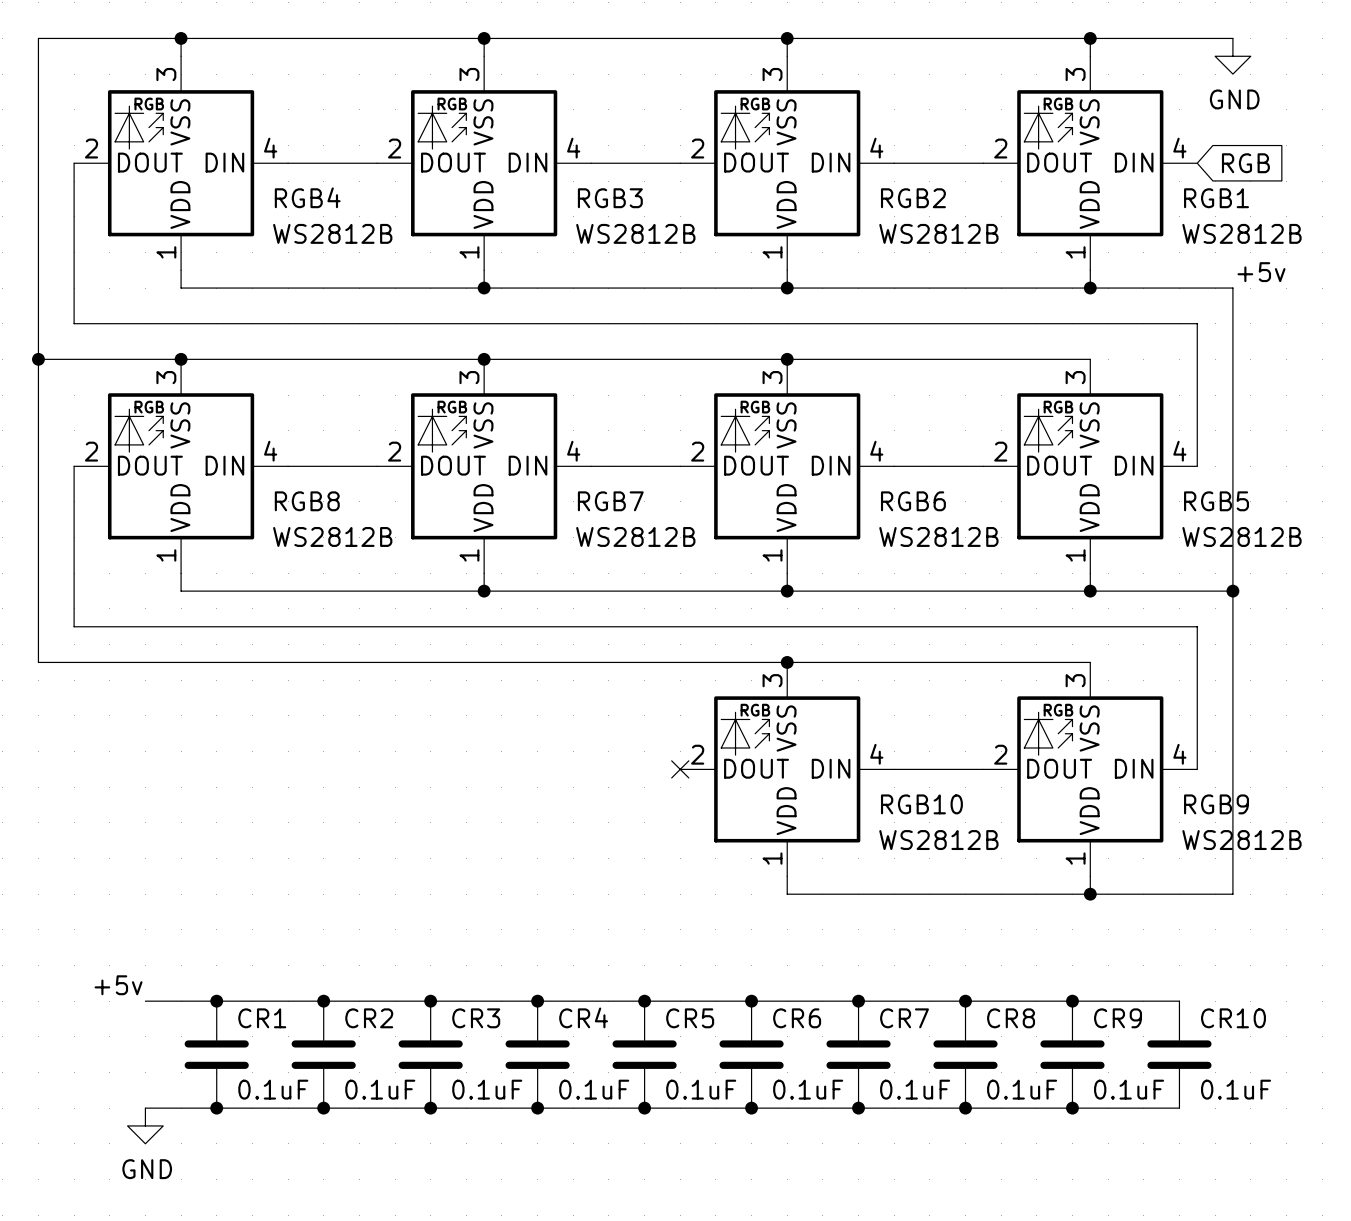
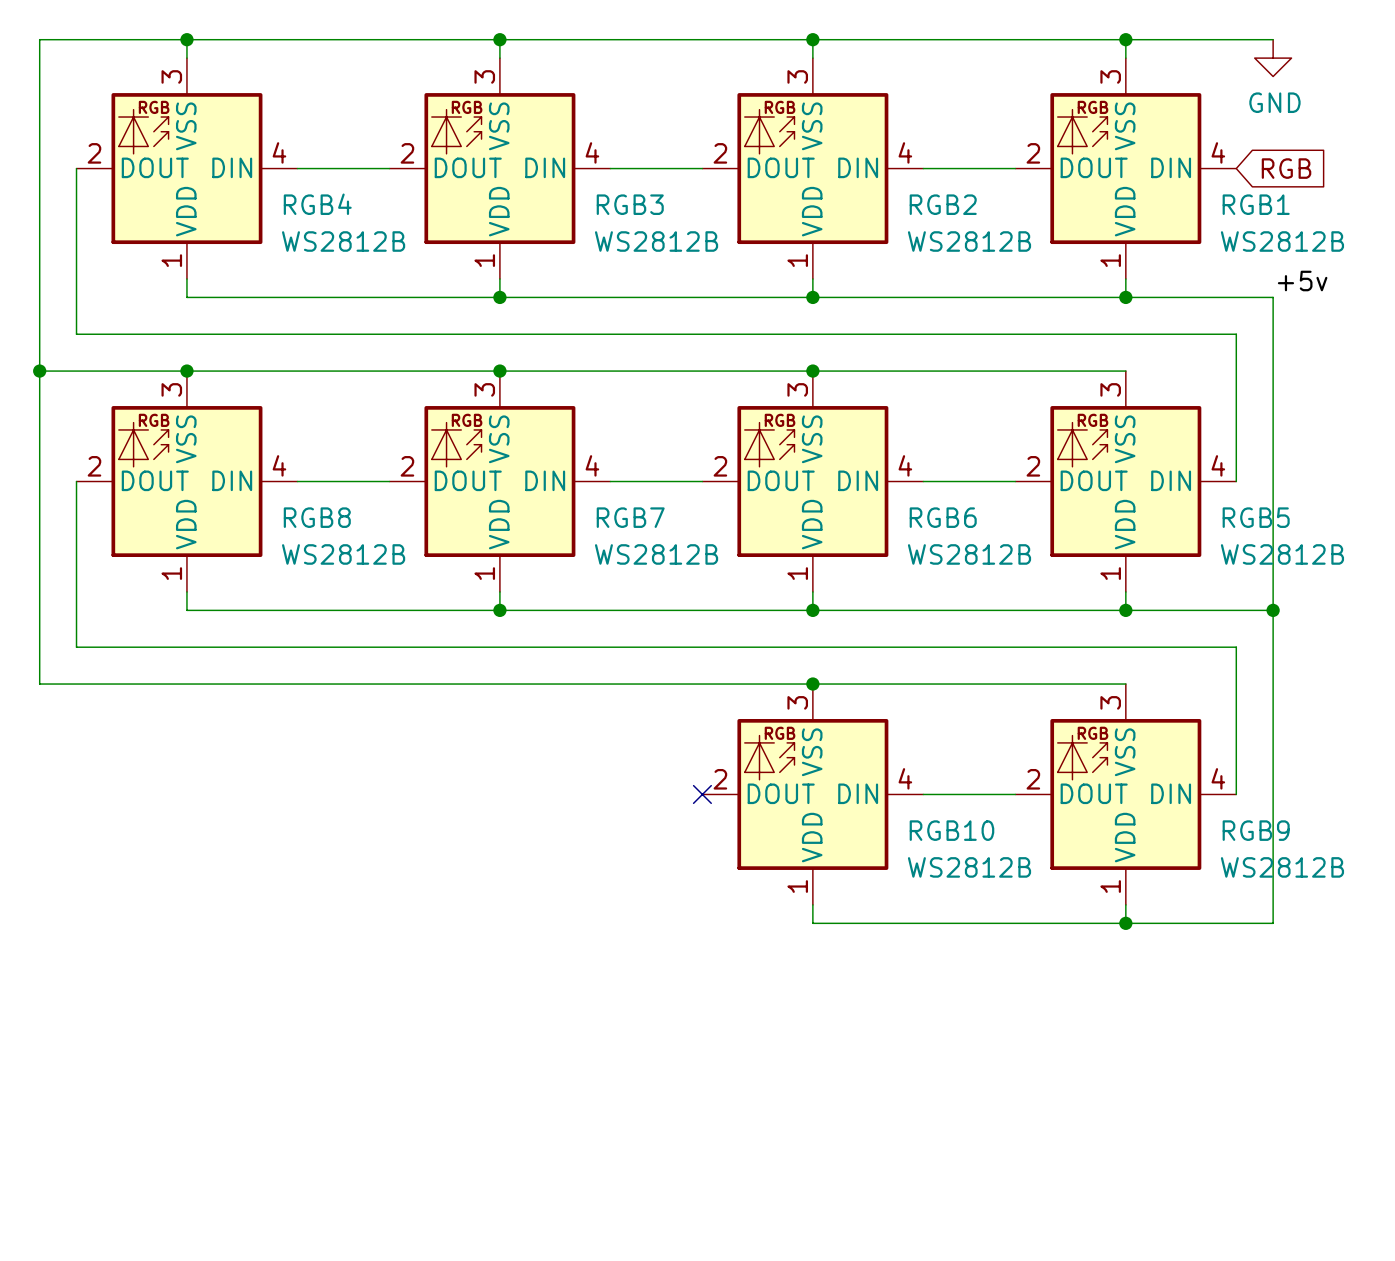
label: +5v (118, 985) -> none
wire: (145, 1001) (1179, 1001) -> none
junction: (216, 1001) -> none
junction: (323, 1001) -> none
junction: (430, 1001) -> none
junction: (537, 1001) -> none
junction: (644, 1001) -> none
junction: (751, 1001) -> none
junction: (858, 1001) -> none
junction: (965, 1001) -> none
junction: (1072, 1001) -> none
CR1: 0.1uF (216, 1054) -> none
CR2: 0.1uF (323, 1054) -> none
CR3: 0.1uF (430, 1054) -> none
CR4: 0.1uF (537, 1054) -> none
CR5: 0.1uF (644, 1054) -> none
CR6: 0.1uF (751, 1054) -> none
CR7: 0.1uF (858, 1054) -> none
CR8: 0.1uF (965, 1054) -> none
CR9: 0.1uF (1072, 1054) -> none
CR10: 0.1uF (1179, 1054) -> none
wire: (145, 1108) (1179, 1108) -> none
junction: (216, 1108) -> none
junction: (323, 1108) -> none
junction: (430, 1108) -> none
junction: (537, 1108) -> none
junction: (644, 1108) -> none
junction: (751, 1108) -> none
junction: (858, 1108) -> none
junction: (965, 1108) -> none
junction: (1072, 1108) -> none
power symbol: GND (145, 1125) -> none

